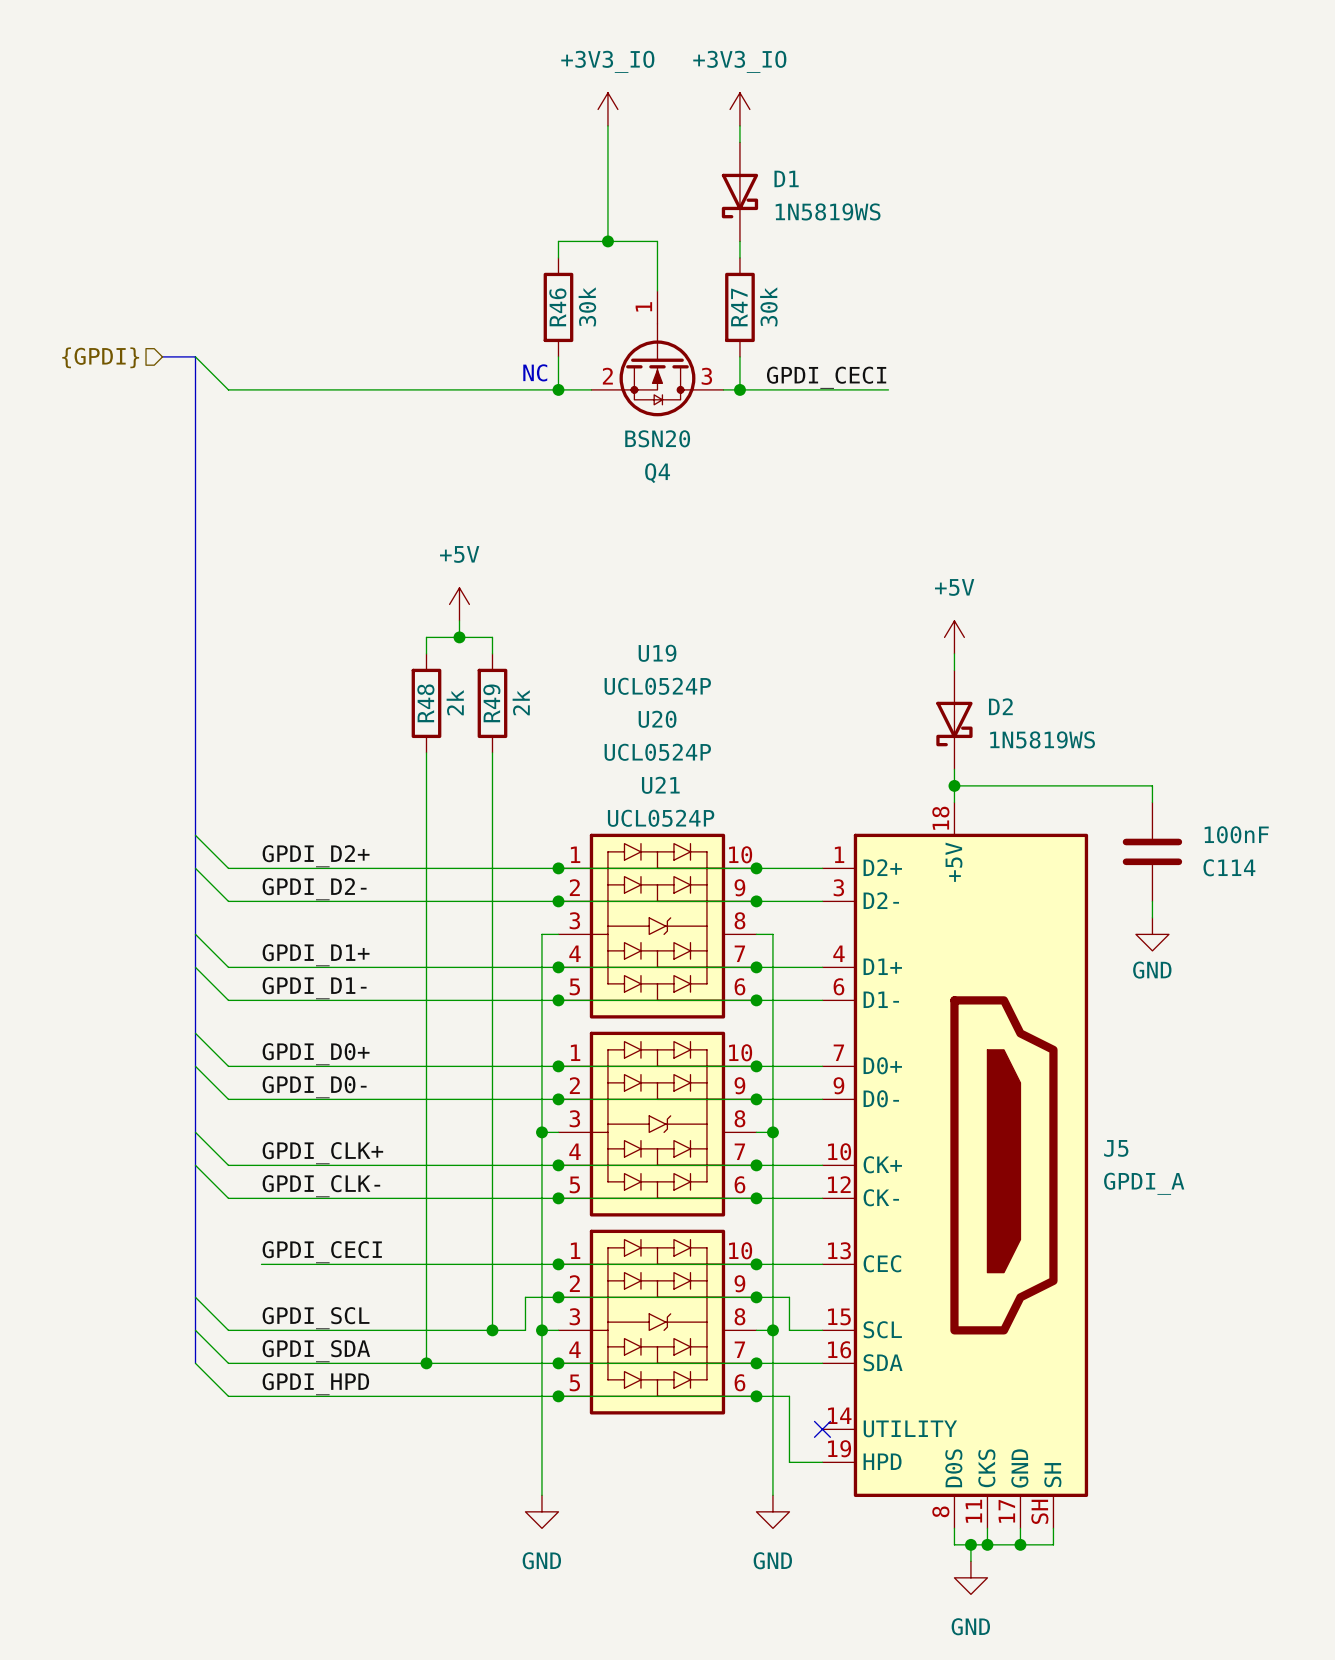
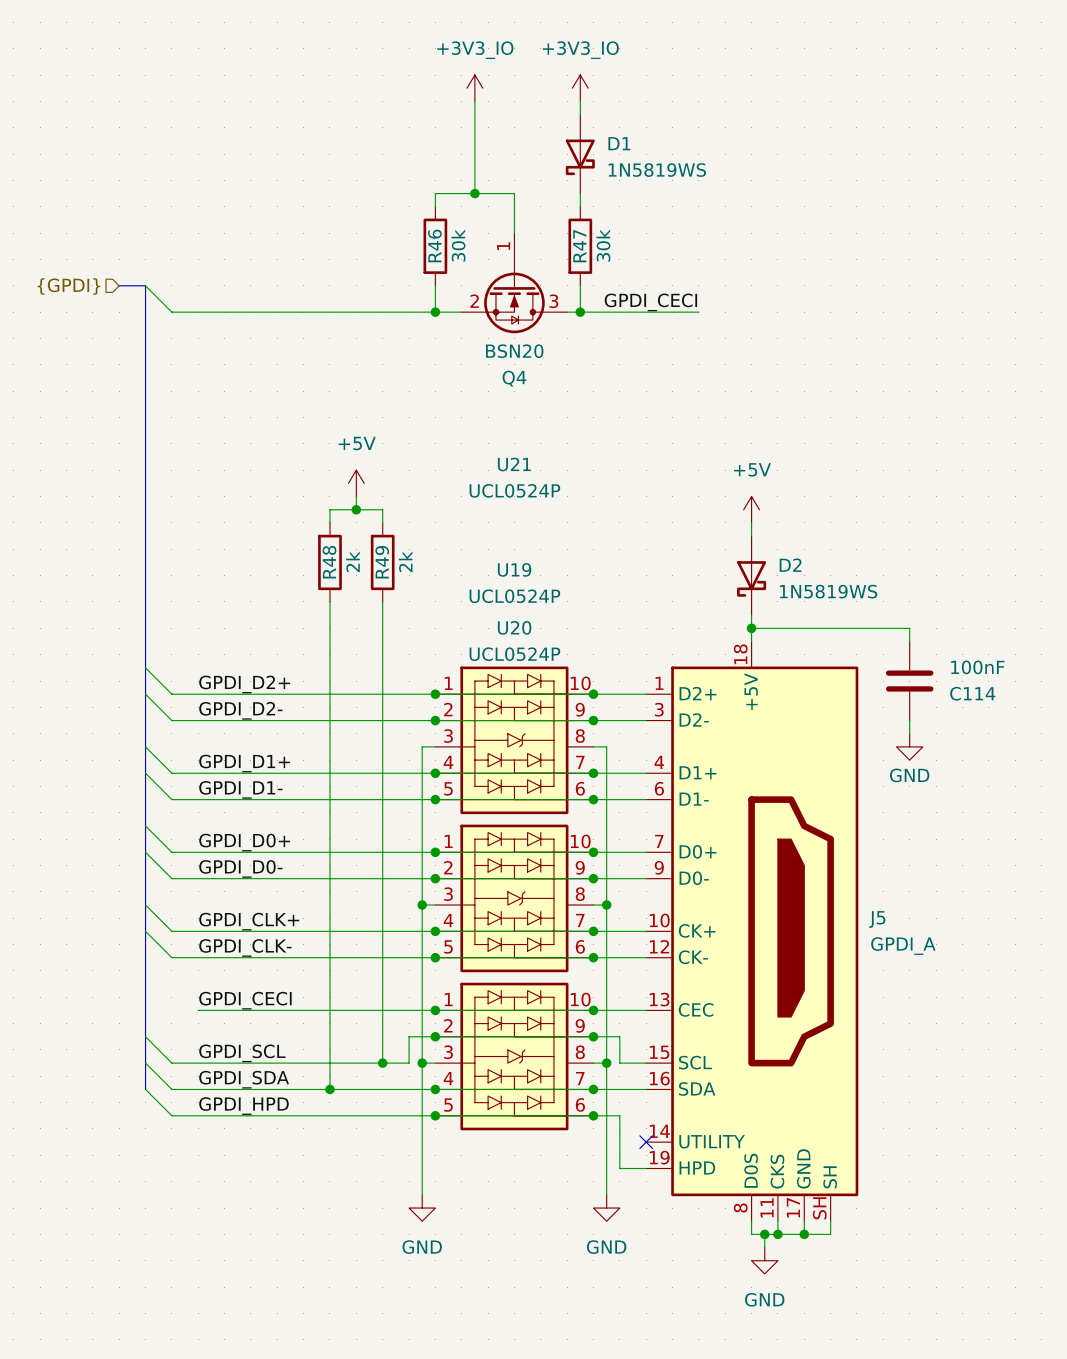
text: NC (535, 372) -> none
U19 name position: U19 (657, 653) -> U19 (514, 569)
U19 value position: UCL0524P (657, 686) -> UCL0524P (514, 596)
U20 name position: U20 (657, 719) -> U20 (514, 627)
U20 value position: UCL0524P (657, 752) -> UCL0524P (514, 654)
U21 name position: U21 (660, 785) -> U21 (514, 464)
U21 value position: UCL0524P (661, 818) -> UCL0524P (514, 490)

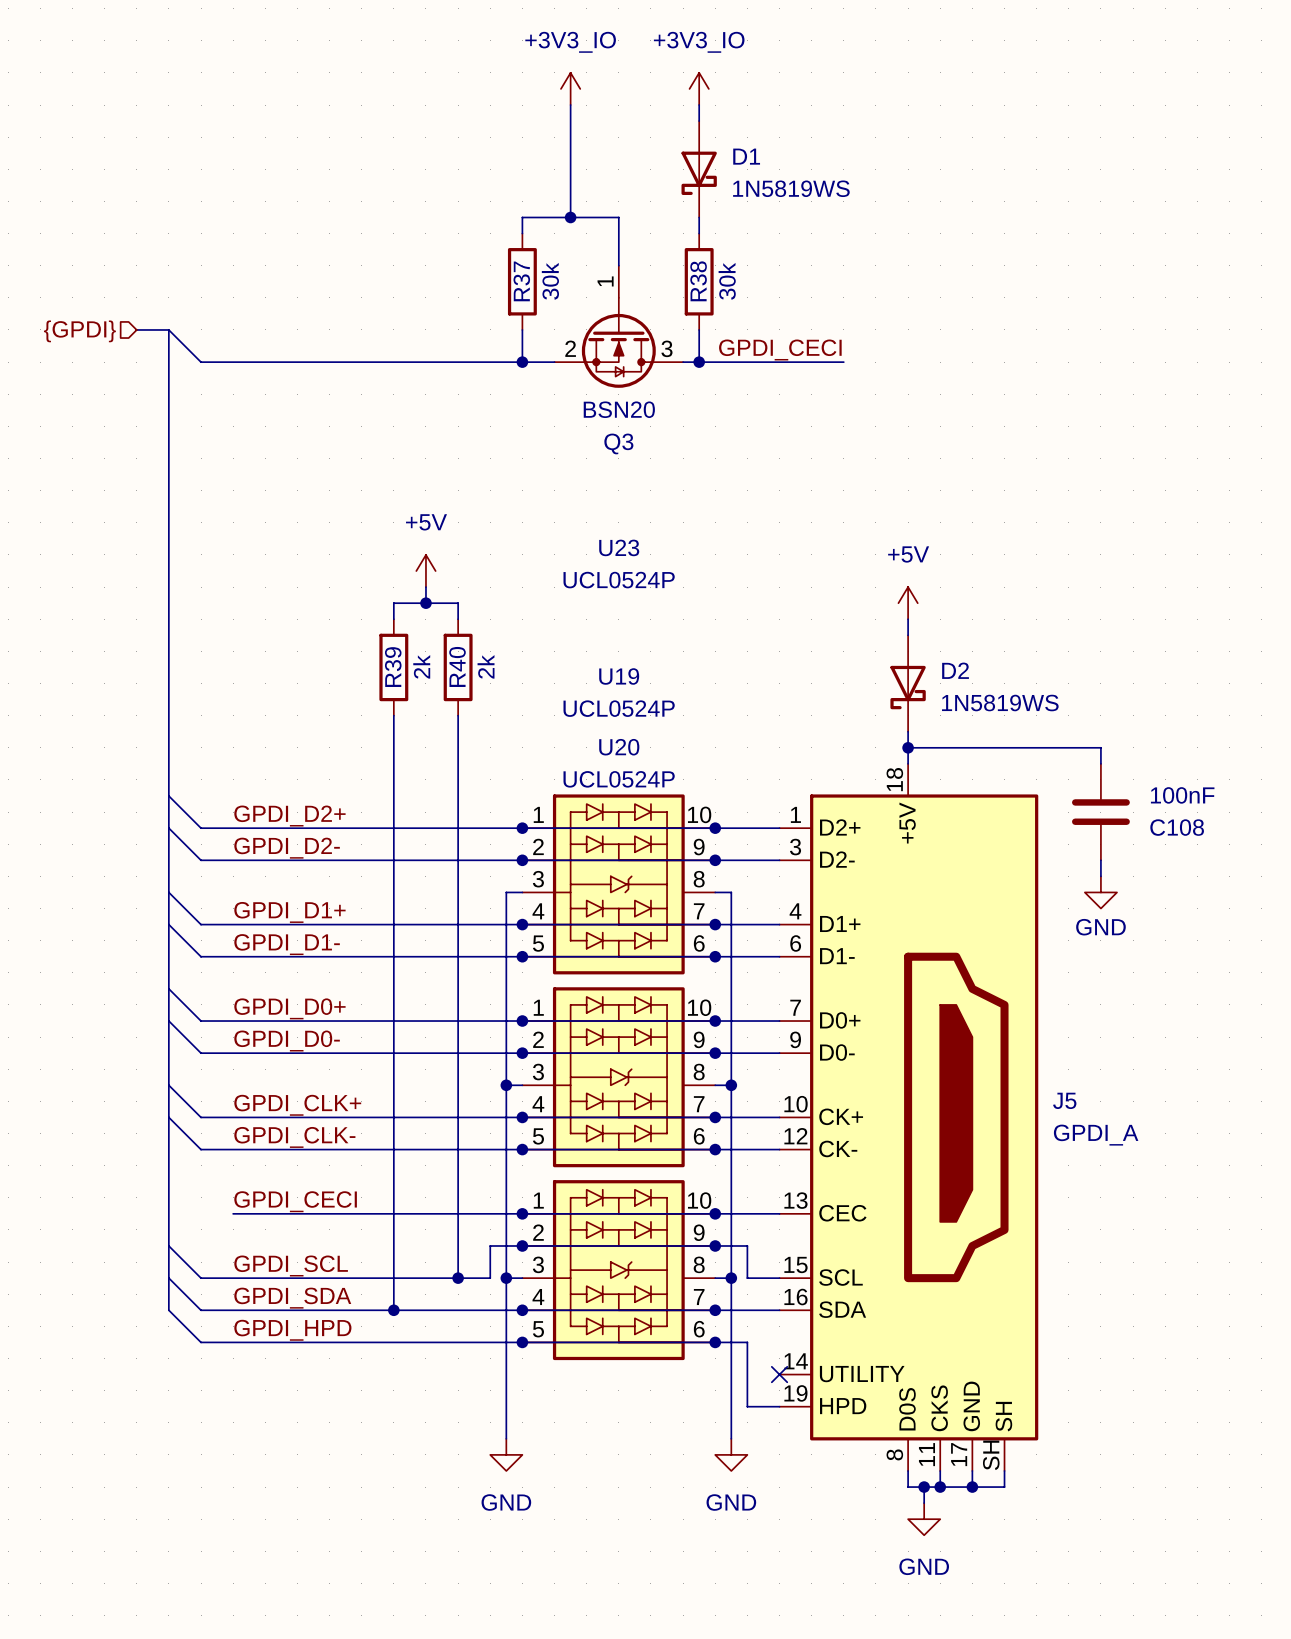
R46 name: R46 (434, 245) -> R37 (521, 281)
R47 name: R47 (579, 246) -> R38 (698, 281)
Q4 name: Q4 (514, 378) -> Q3 (618, 443)
U21 name: U21 (514, 464) -> U23 (619, 547)
R48 name: R48 (329, 562) -> R39 (393, 667)
R49 name: R49 (382, 562) -> R40 (457, 666)
C114 name: C114 (972, 693) -> C108 (1177, 827)

